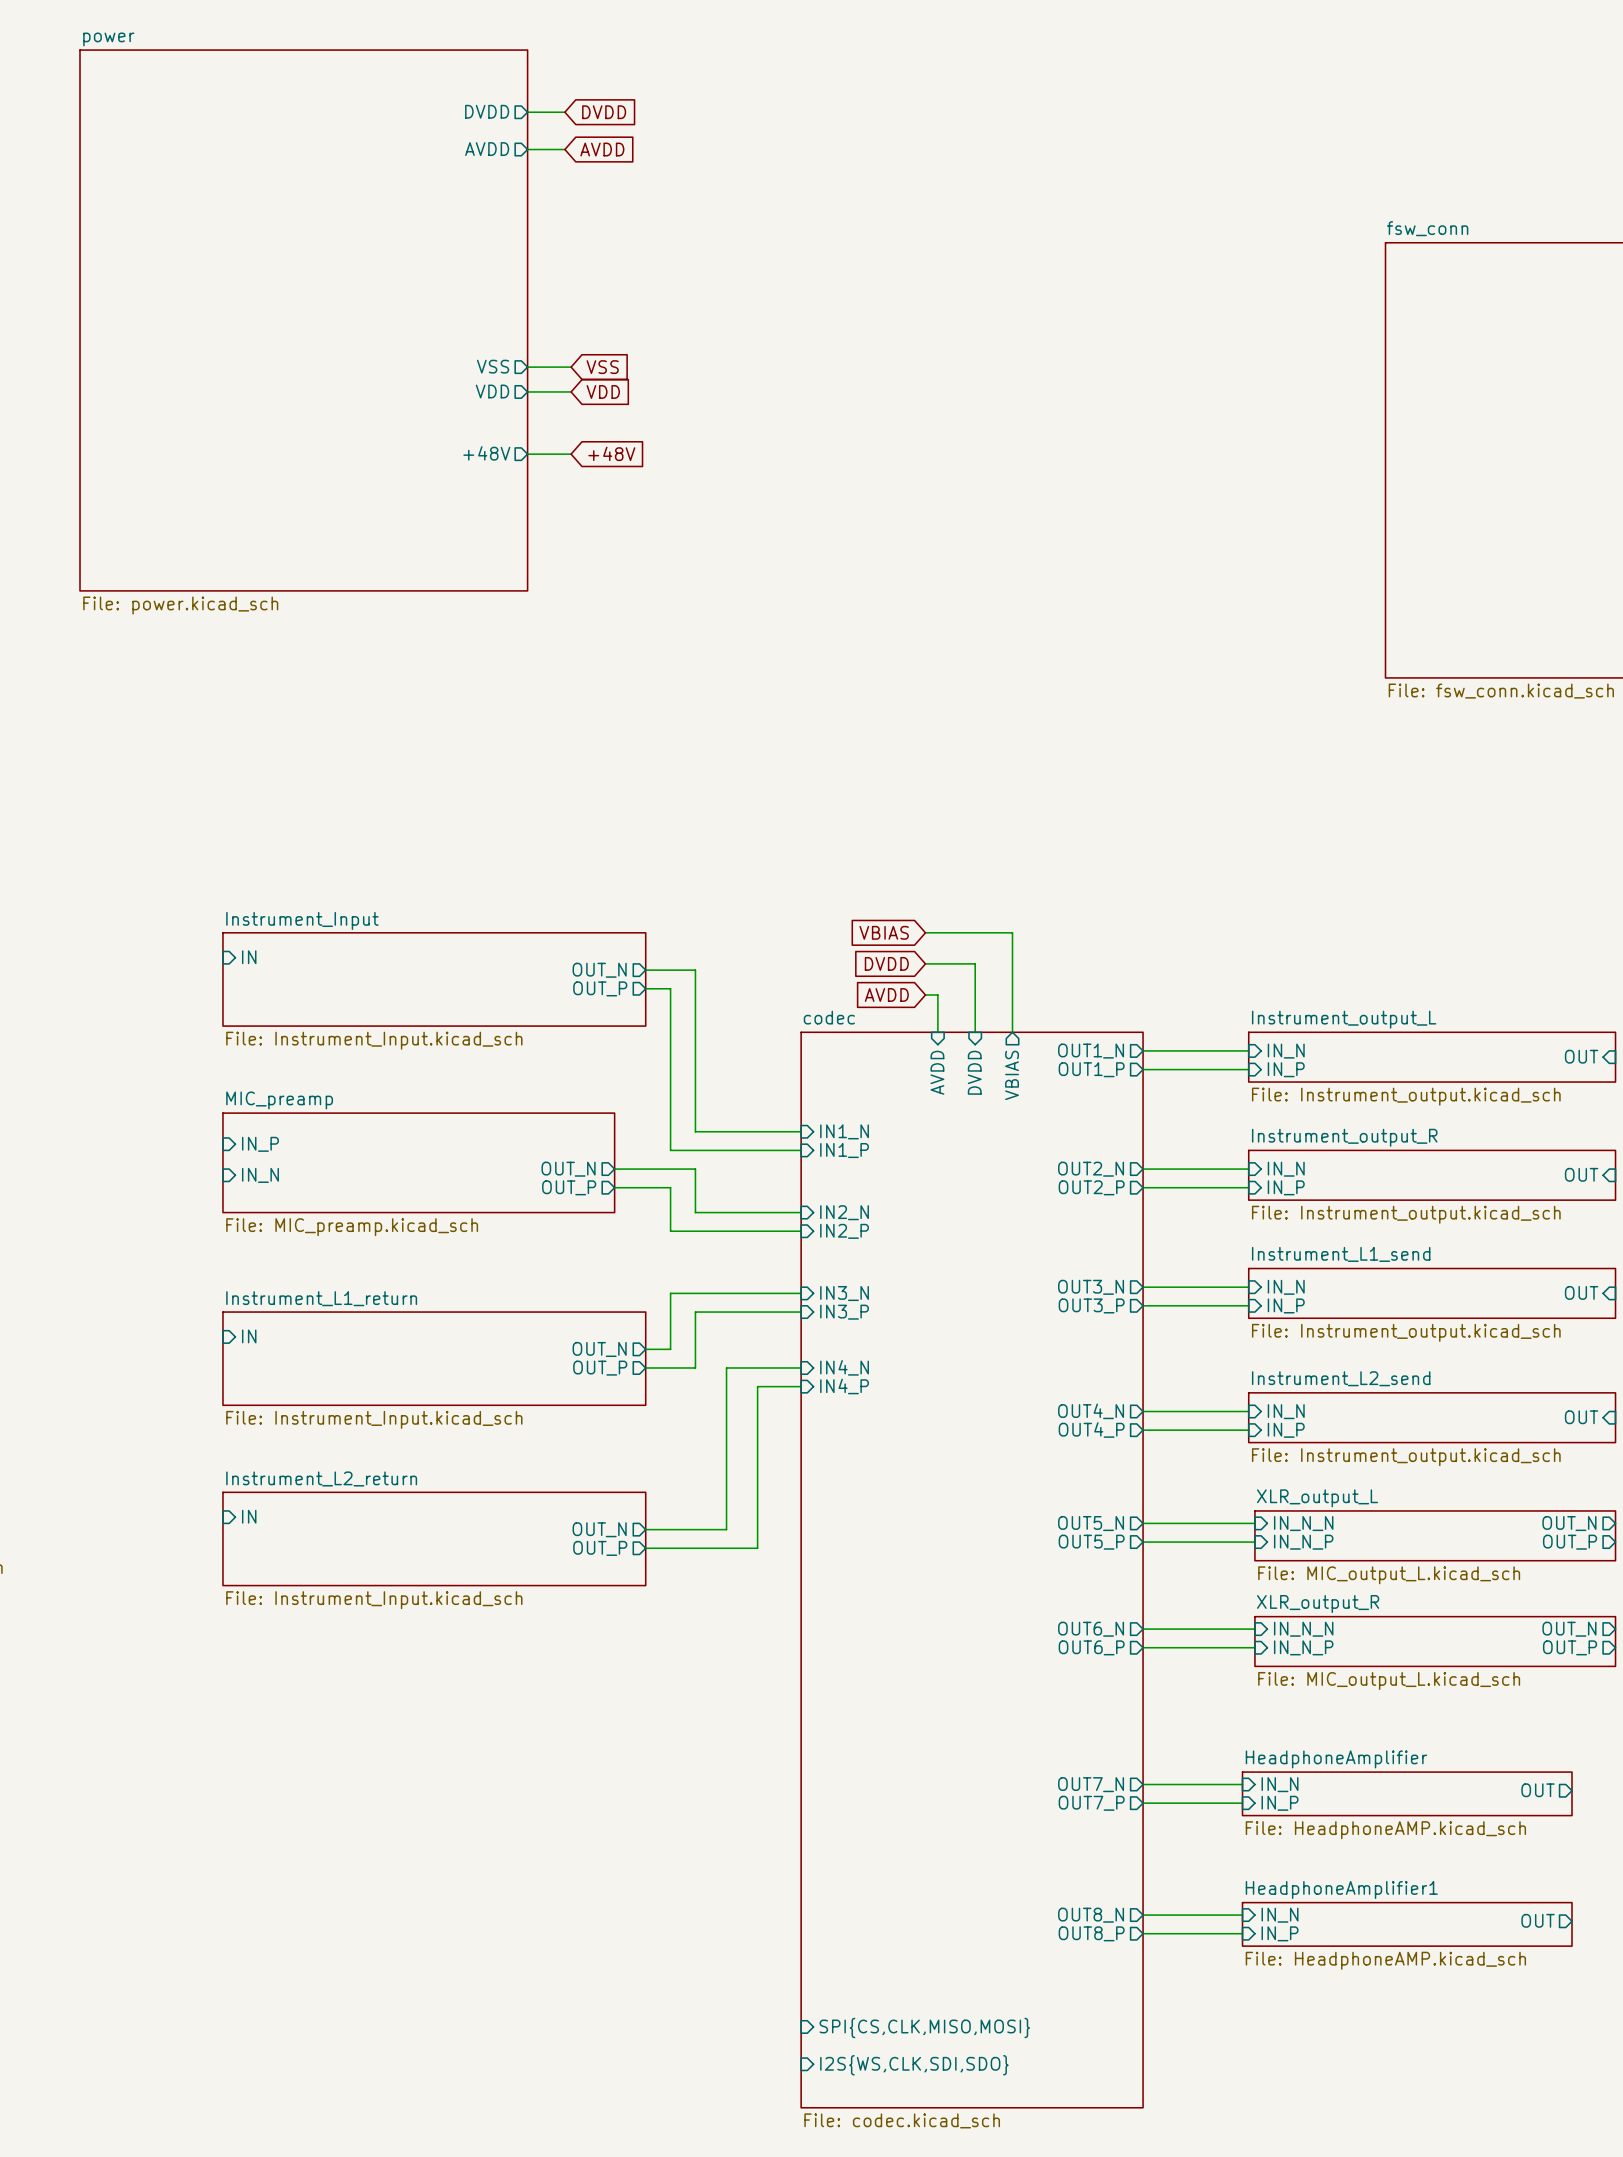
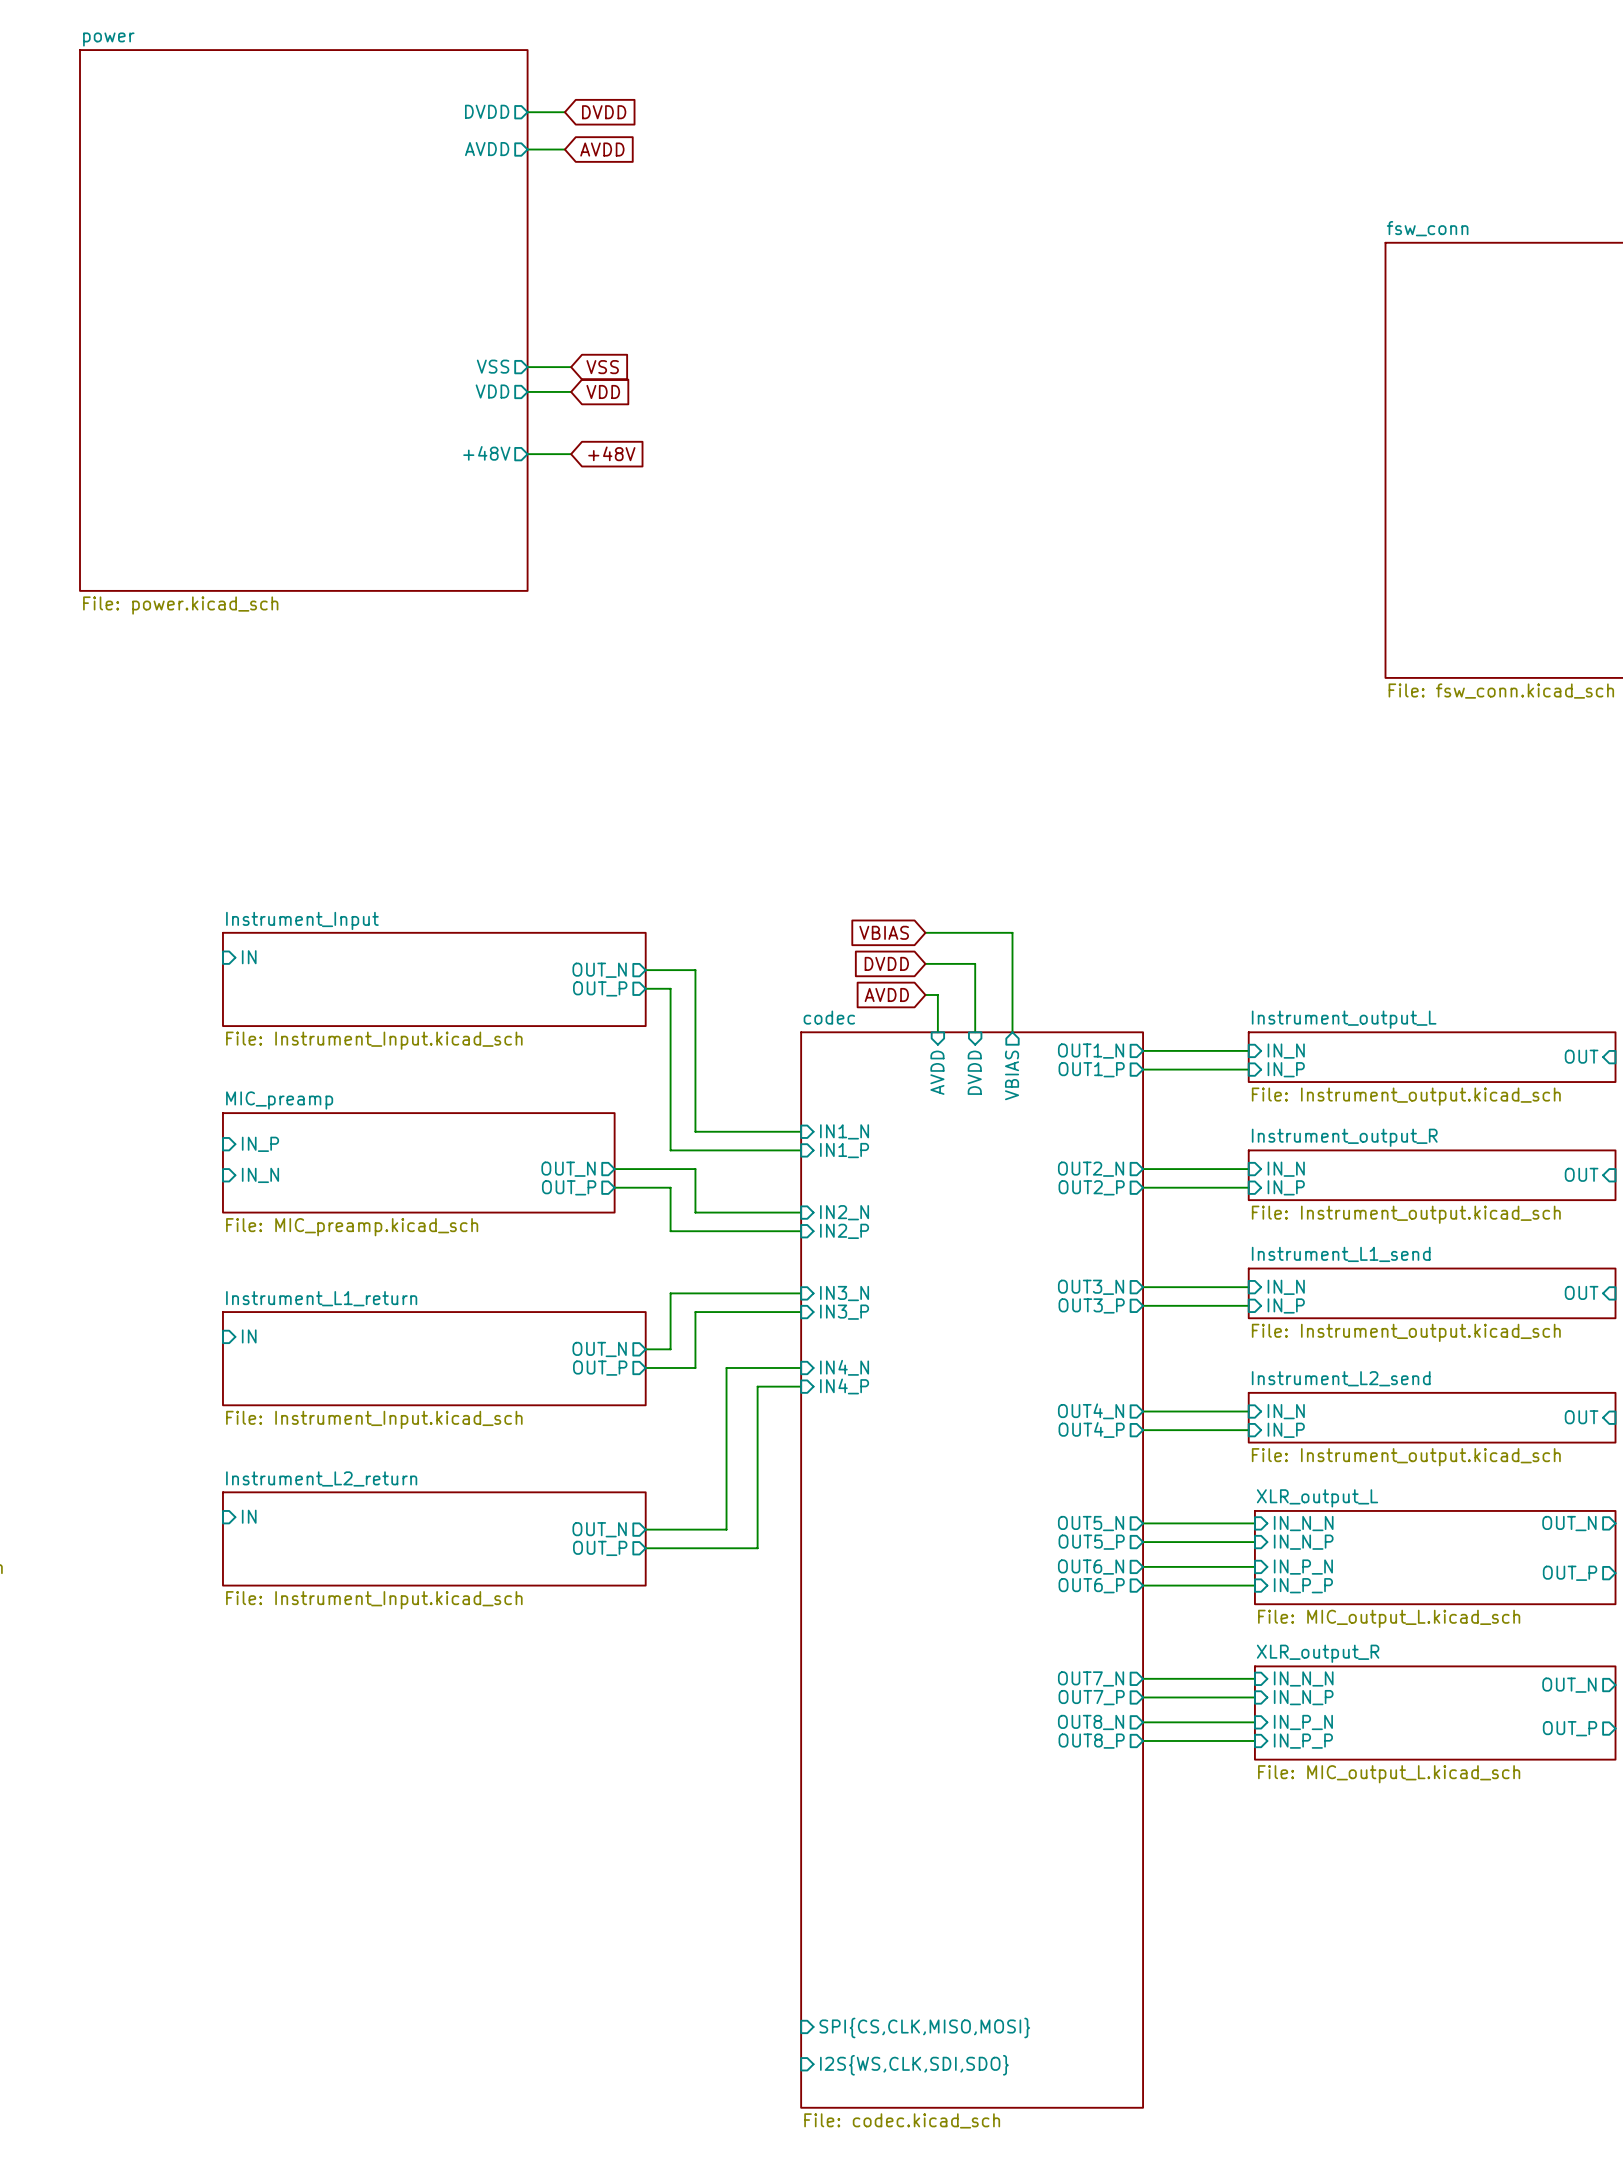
sheet XLR_output_L: File: MIC_output_L.kicad_sch (1435, 1535) -> none
sheet pin position: OUT_P (1570, 1542) -> OUT_P (1570, 1573)
sheet XLR_output_L: none -> File: MIC_output_L.kicad_sch (1435, 1557)
wire: none -> (1143, 1566) (1254, 1566)
sheet pin: none -> IN_P_N (1303, 1567)
wire: none -> (1143, 1585) (1254, 1585)
sheet pin: none -> IN_P_P (1303, 1585)
sheet pin position: OUT6_N (1091, 1629) -> OUT6_N (1091, 1567)
wire: (1143, 1629) (1254, 1629) -> (1143, 1678) (1254, 1678)
sheet pin position: IN_N_N (1303, 1629) -> IN_N_N (1303, 1678)
sheet pin position: OUT_N (1569, 1629) -> OUT_N (1569, 1685)
sheet XLR_output_R: File: MIC_output_L.kicad_sch (1435, 1641) -> none
sheet pin position: OUT6_P (1091, 1647) -> OUT6_P (1091, 1585)
wire: (1143, 1647) (1254, 1647) -> (1143, 1697) (1254, 1697)
sheet pin position: IN_N_P (1303, 1647) -> IN_N_P (1303, 1697)
sheet pin: OUT_P (1570, 1647) -> none
sheet XLR_output_R: none -> File: MIC_output_L.kicad_sch (1435, 1713)
wire: none -> (1143, 1722) (1254, 1722)
sheet pin: none -> IN_P_N (1303, 1722)
sheet pin: none -> OUT_P (1570, 1728)
wire: none -> (1143, 1740) (1254, 1740)
sheet pin: none -> IN_P_P (1303, 1741)
sheet pin position: OUT7_N (1091, 1784) -> OUT7_N (1091, 1678)
wire: (1143, 1784) (1242, 1784) -> none
sheet pin: IN_N (1280, 1784) -> none
sheet pin: OUT (1538, 1790) -> none
sheet HeadphoneAmplifier: File: HeadphoneAMP.kicad_sch (1407, 1793) -> none
sheet pin position: OUT7_P (1091, 1803) -> OUT7_P (1091, 1697)
wire: (1143, 1803) (1242, 1803) -> none
sheet pin: IN_P (1280, 1803) -> none
sheet pin position: OUT8_N (1091, 1915) -> OUT8_N (1091, 1722)
wire: (1143, 1915) (1242, 1915) -> none
sheet pin: IN_N (1280, 1915) -> none
sheet pin: OUT (1538, 1920) -> none
sheet HeadphoneAmplifier1: File: HeadphoneAMP.kicad_sch (1407, 1924) -> none
sheet pin position: OUT8_P (1091, 1933) -> OUT8_P (1091, 1741)
wire: (1143, 1933) (1242, 1933) -> none
sheet pin: IN_P (1280, 1933) -> none

